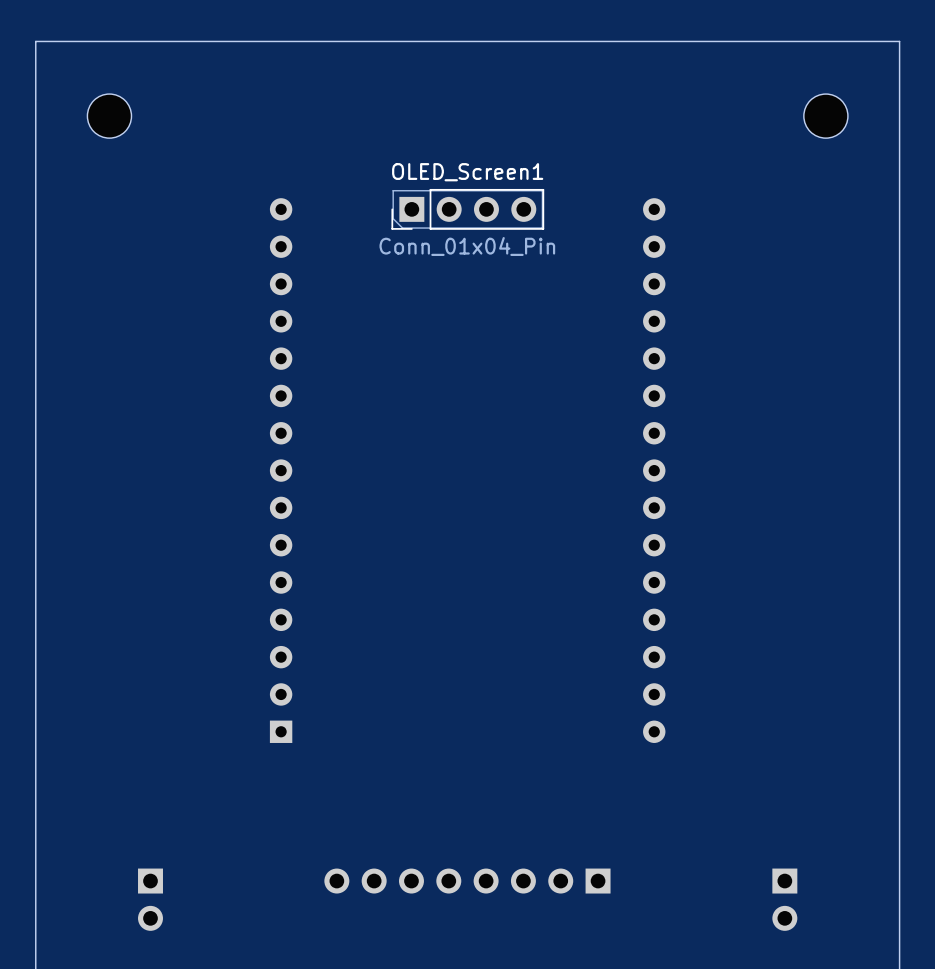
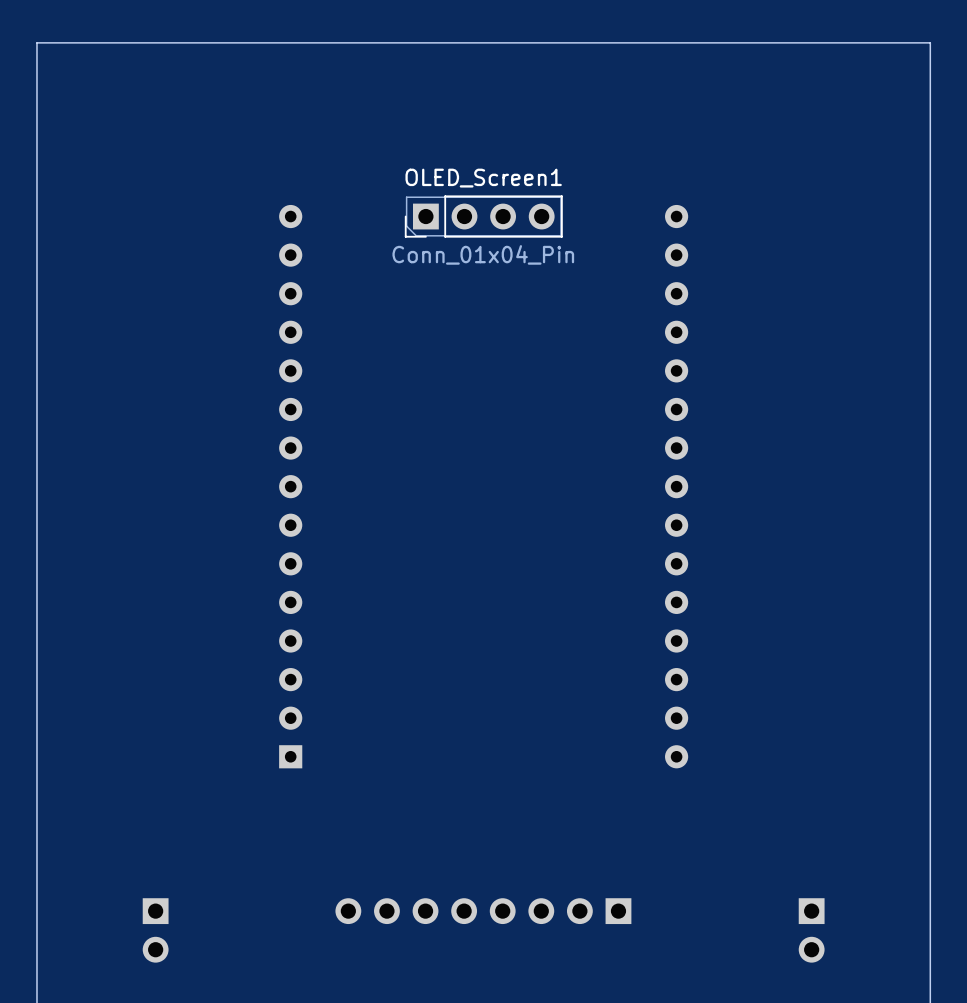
part: (109, 116) -> none
part: (825, 116) -> none

